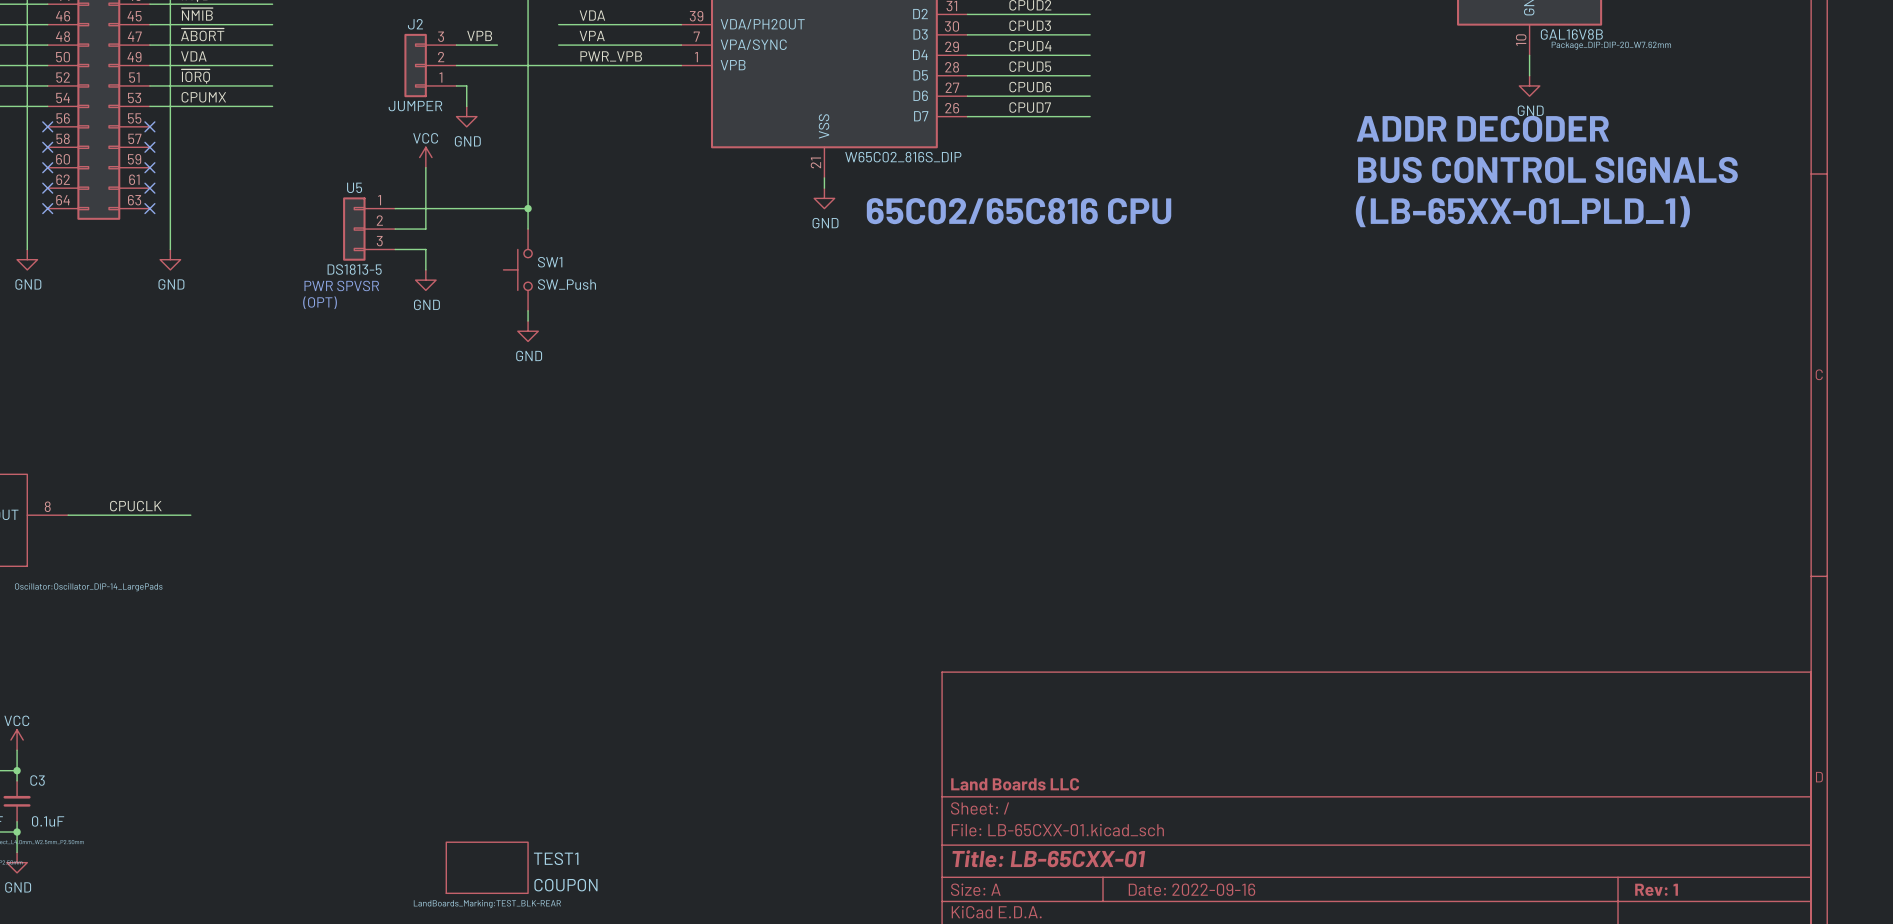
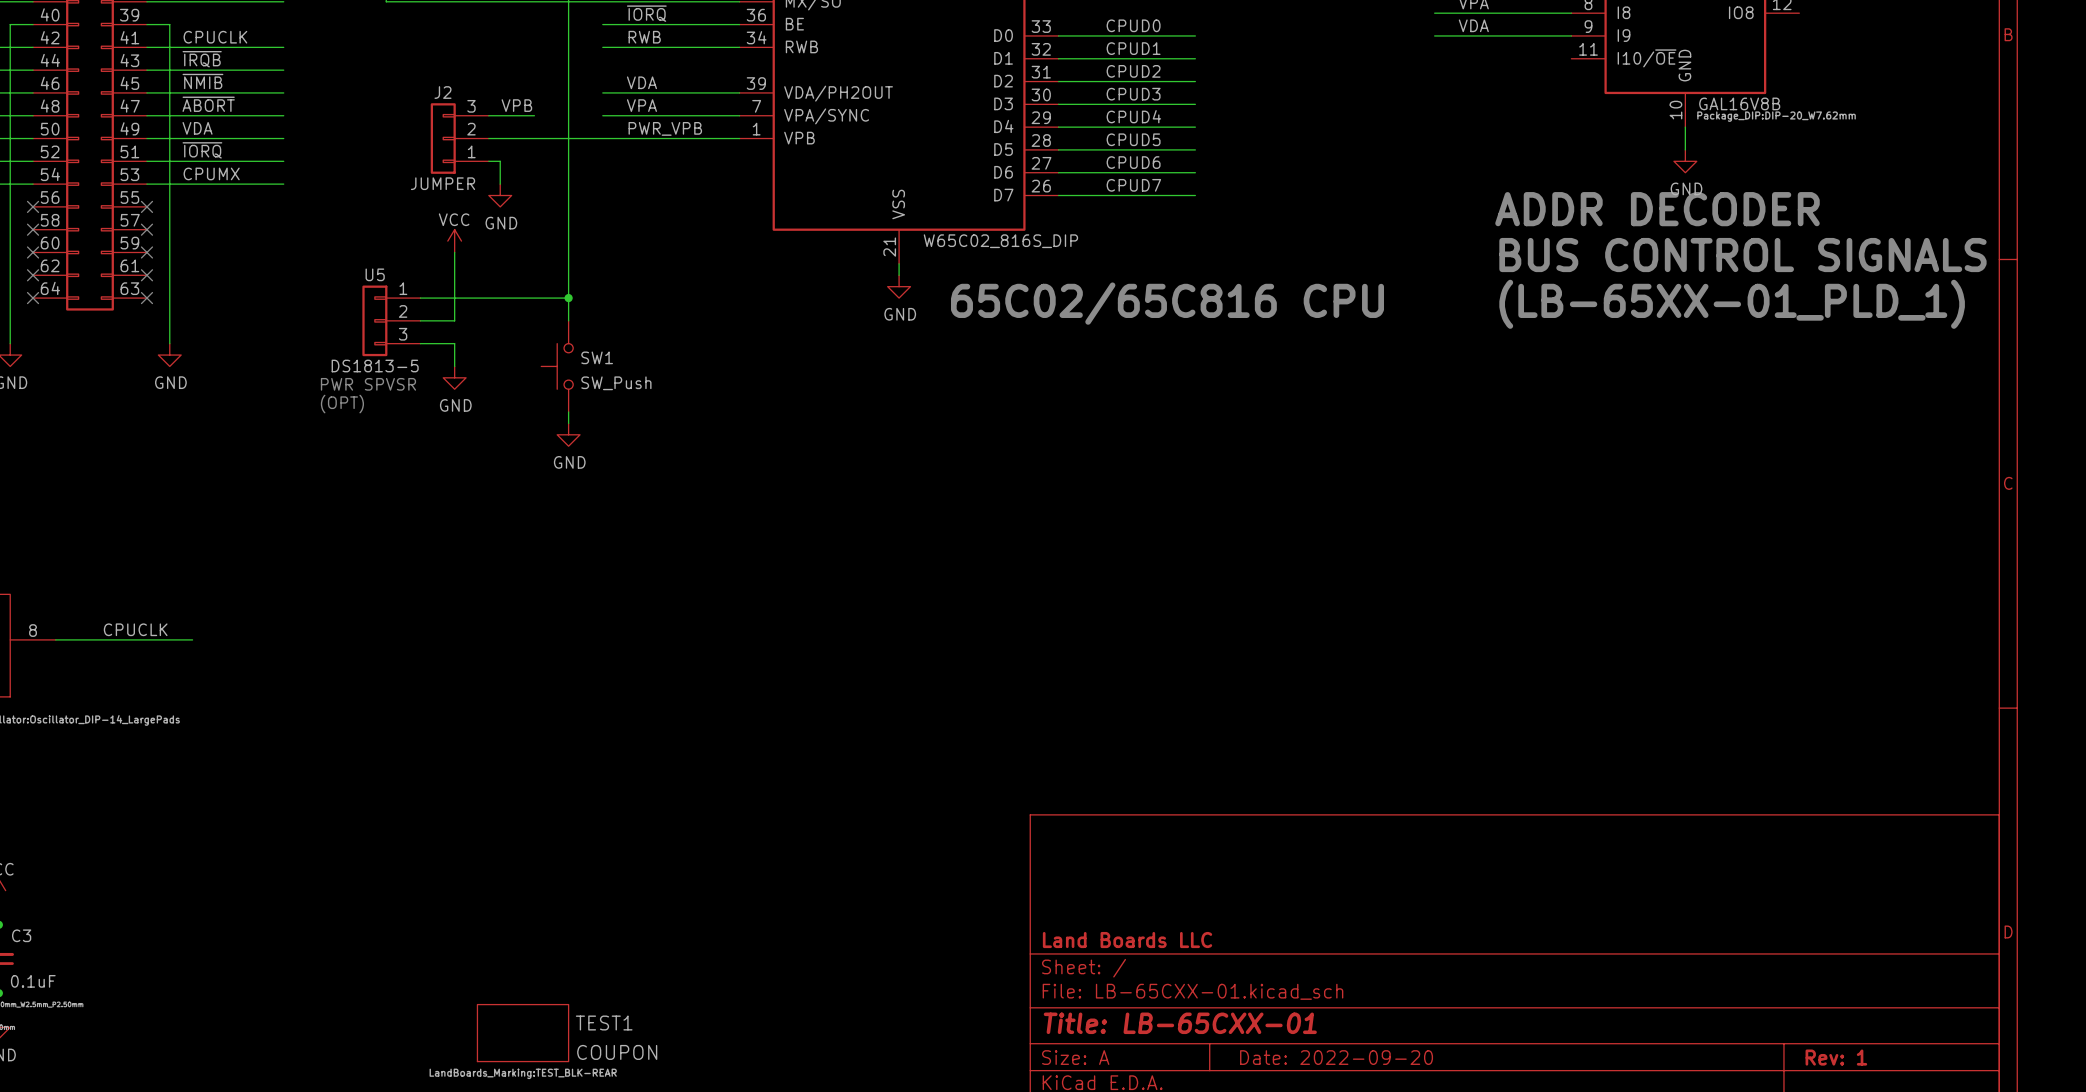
title block: Date: 2022-09-16 (1191, 889) -> Date: 2022-09-20 (1336, 1057)

